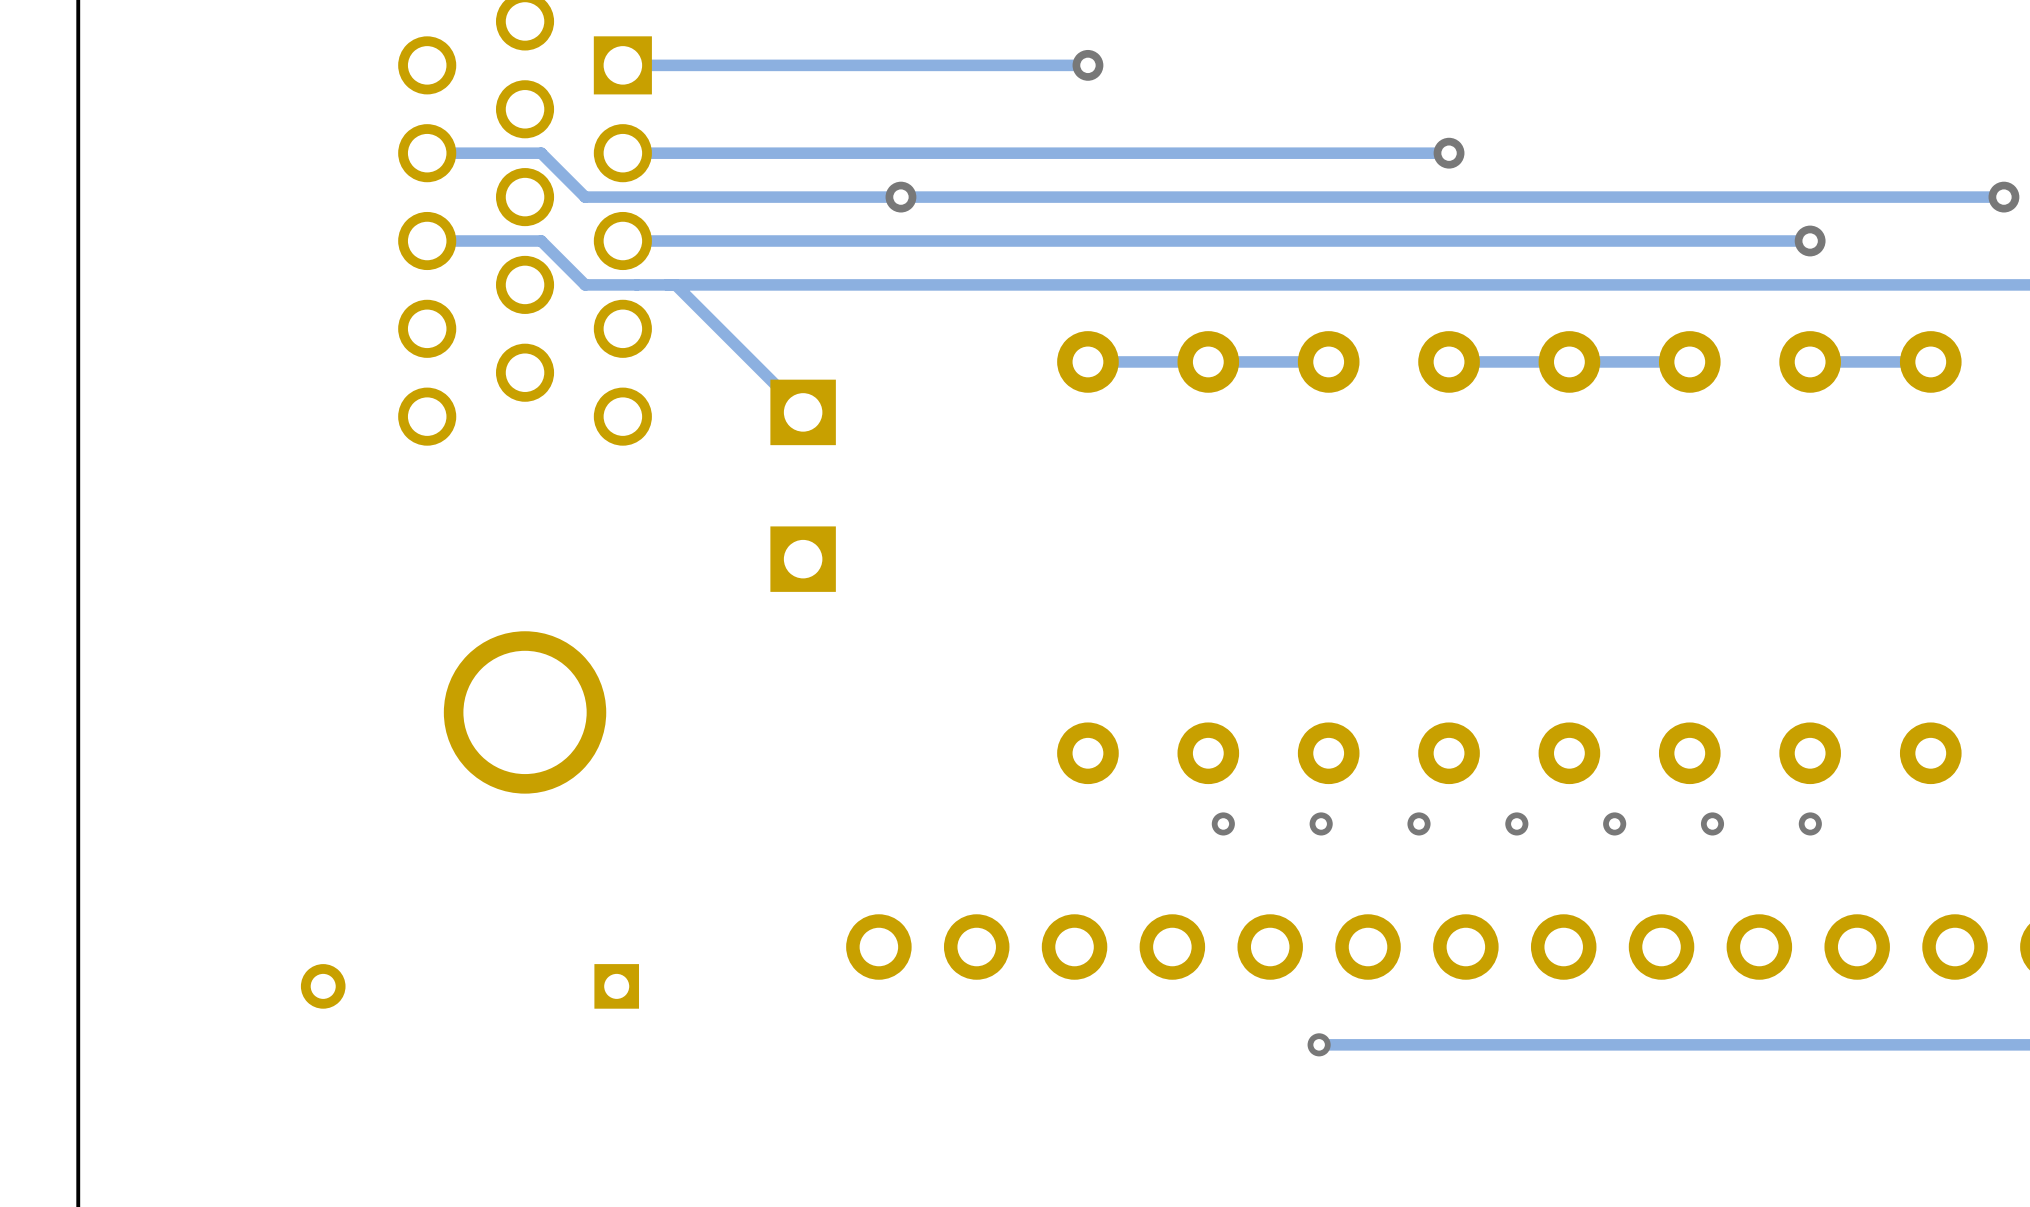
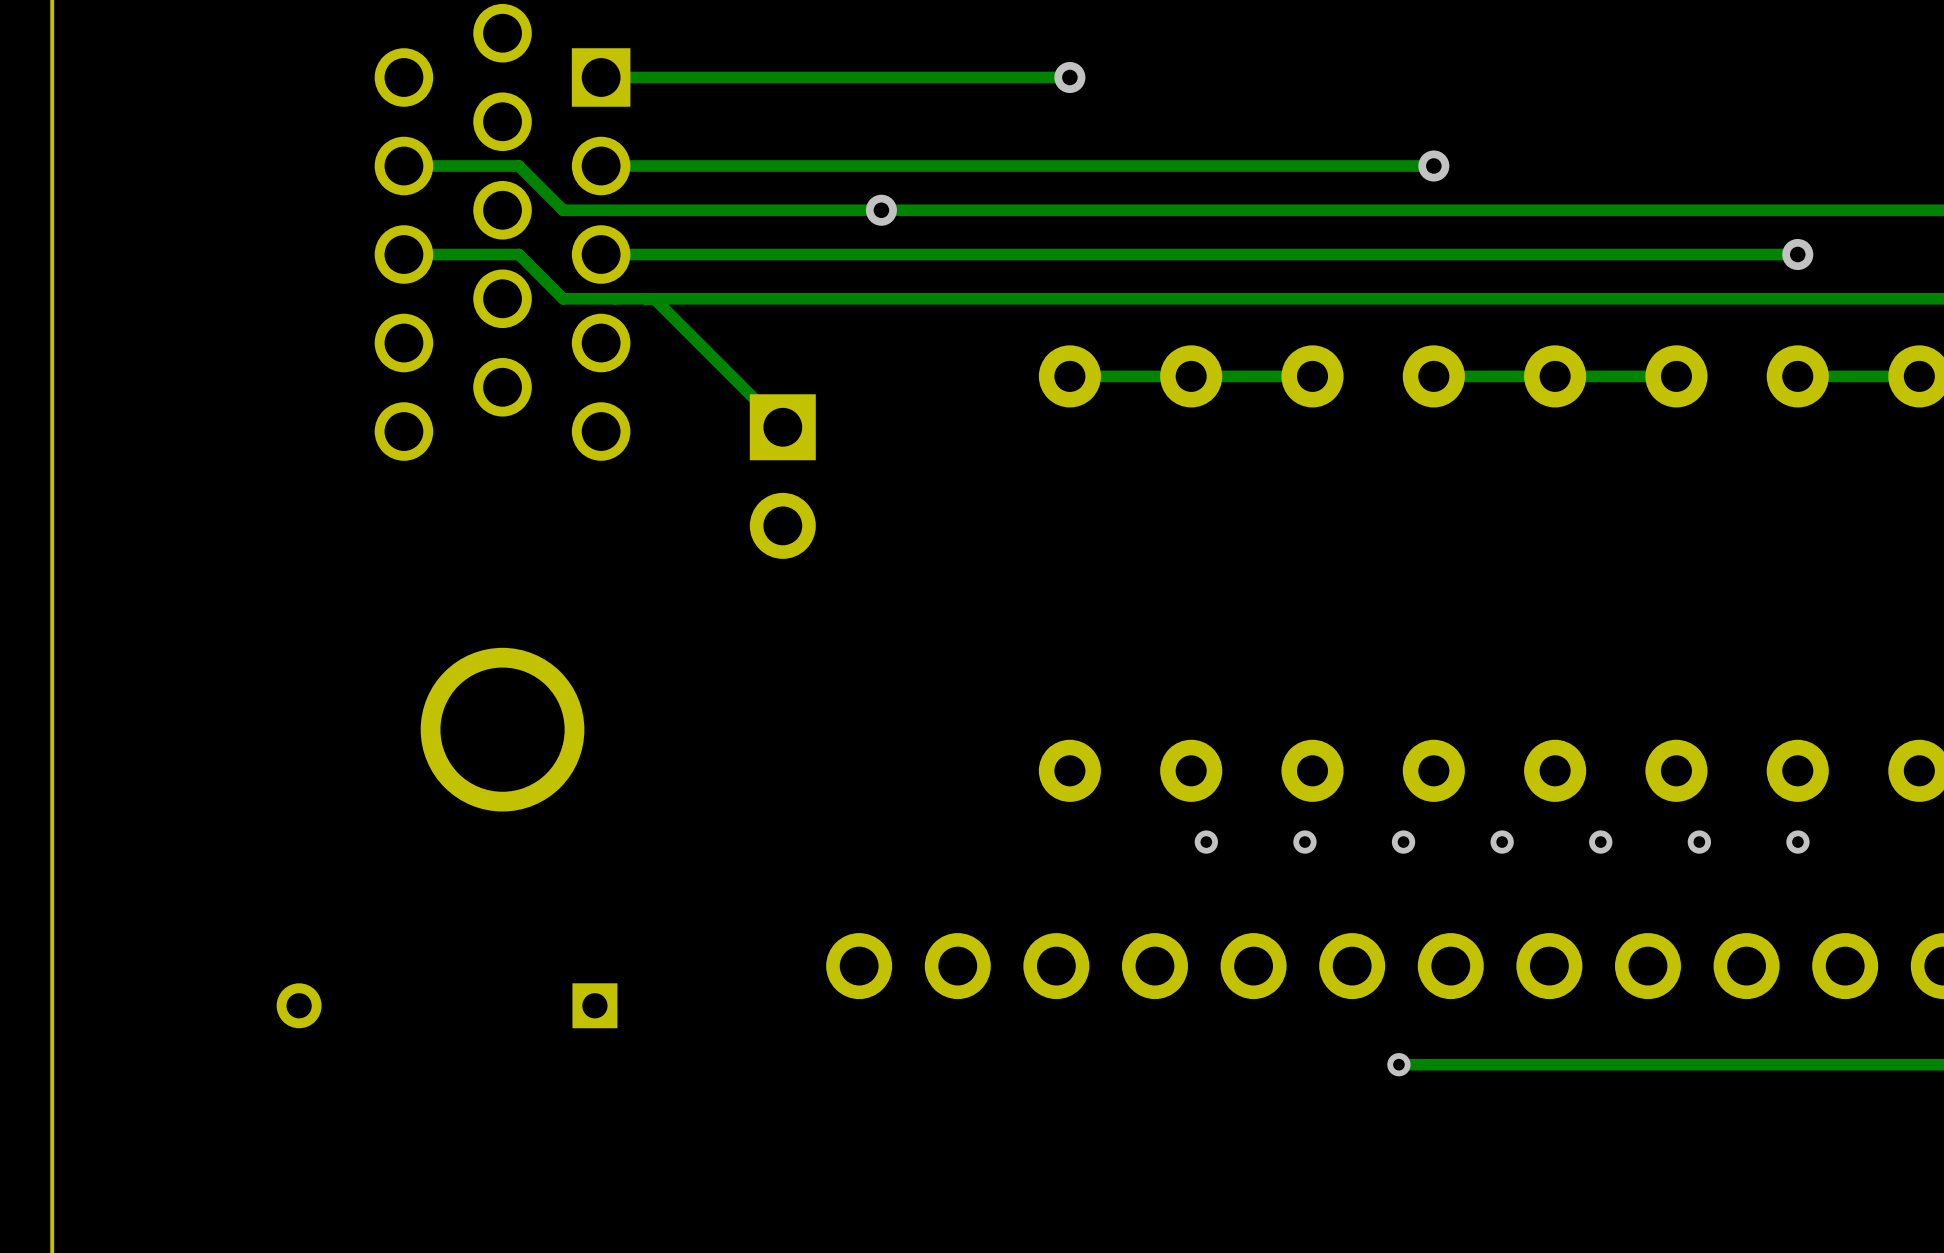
part: none -> (782, 476)
part: (803, 559) -> none
via position: (1319, 1044) -> (1398, 1064)
track: (1414, 1044) (1319, 1044) -> none

